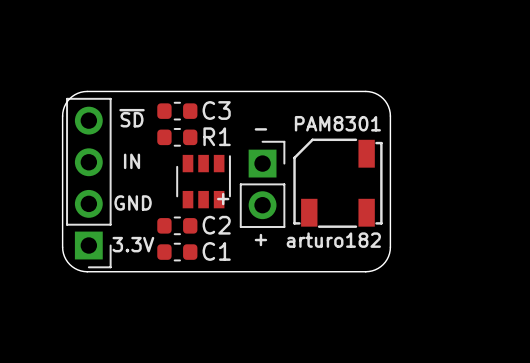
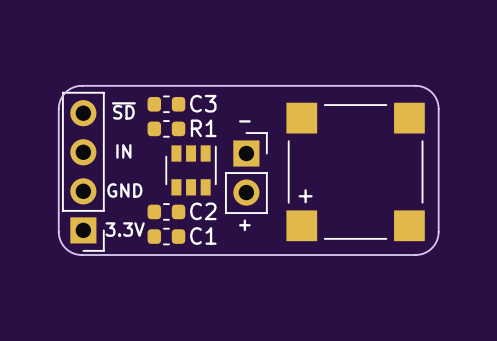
board edge: (365, 91) (375, 93) (383, 98) (388, 106) (390, 116) (390, 250) (387, 259) (380, 266) (365, 271) -> (343, 85) (421, 86) (433, 94) (438, 108) (438, 231) (435, 243) (429, 250) (418, 254) (343, 255)
text: PAM8301 (337, 123) -> none
part: (337, 183) -> none
part: none -> (355, 171)
text: + (223, 199) -> none
text: arturo182 (333, 240) -> none

